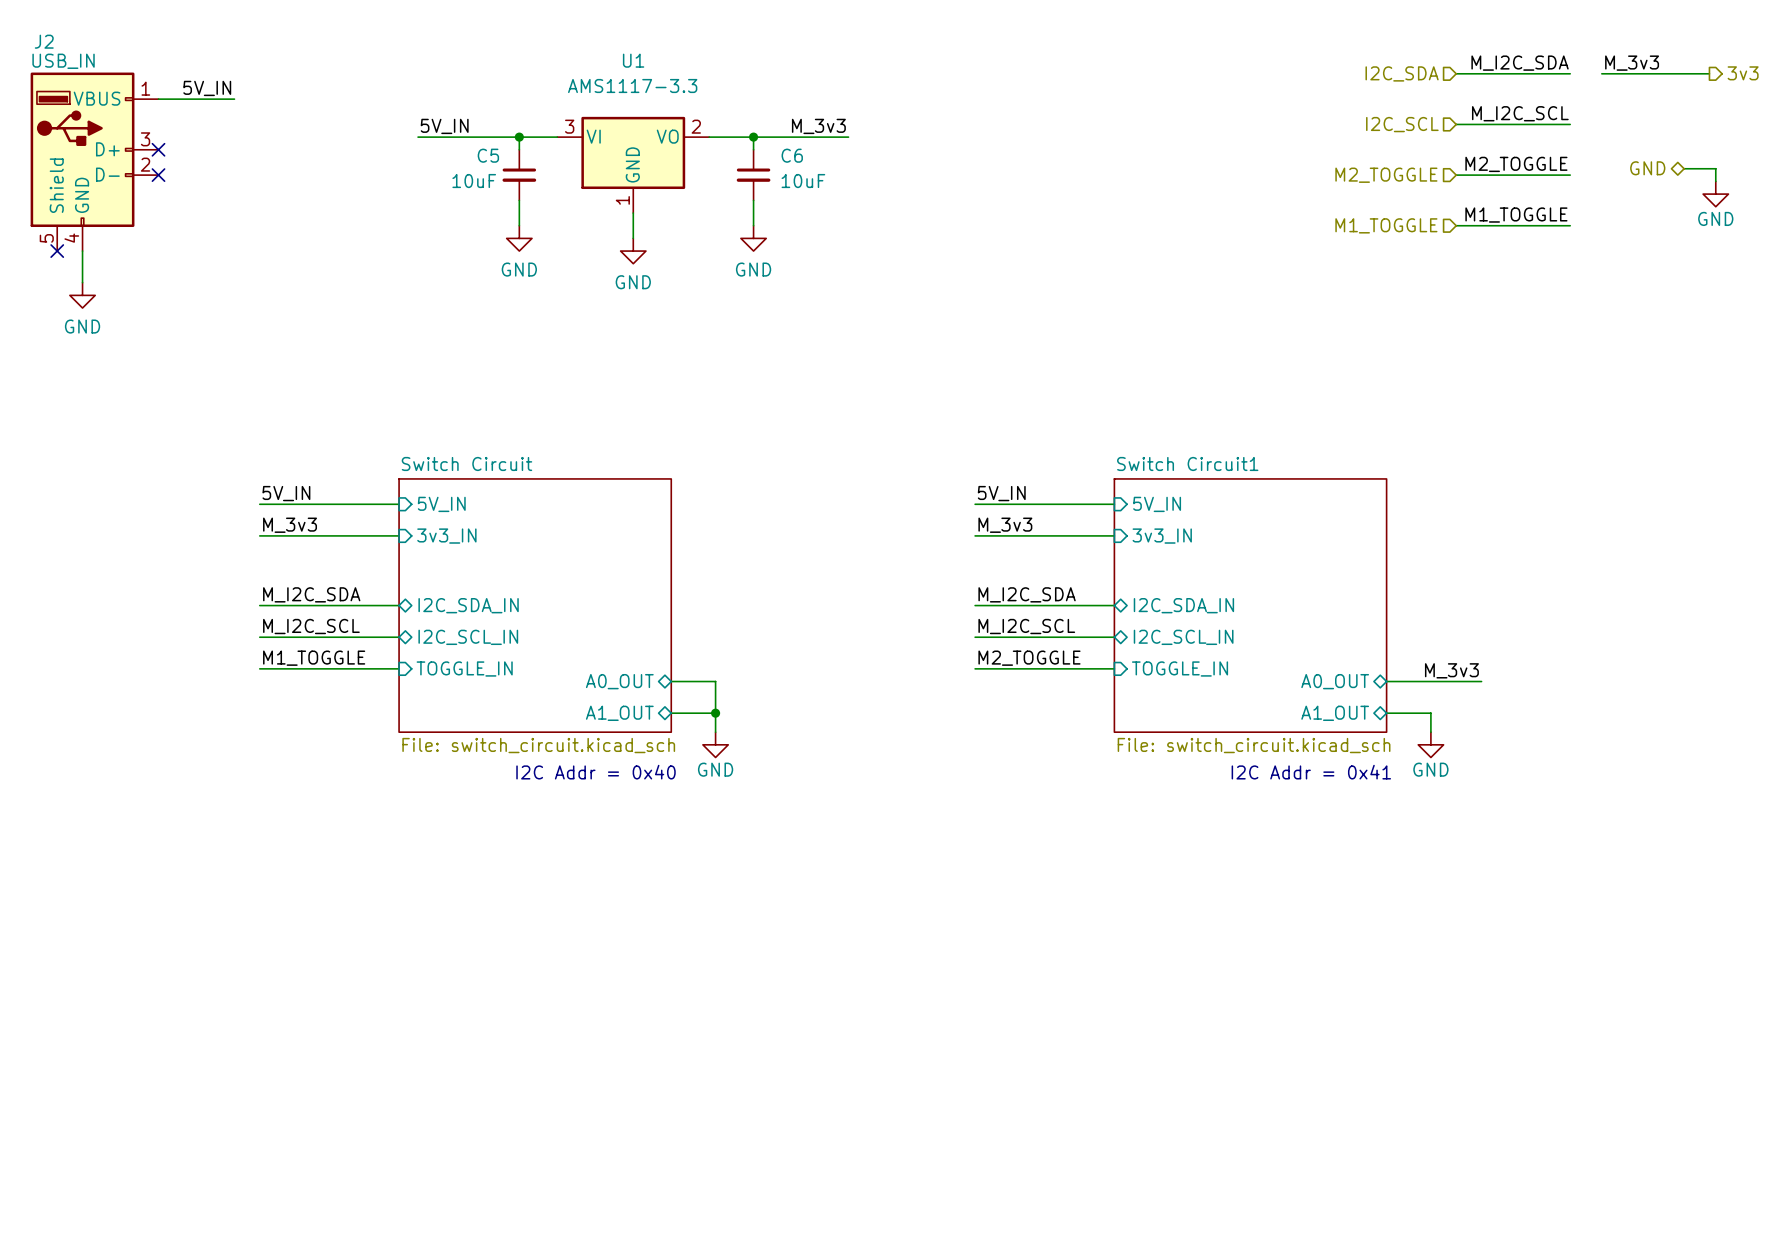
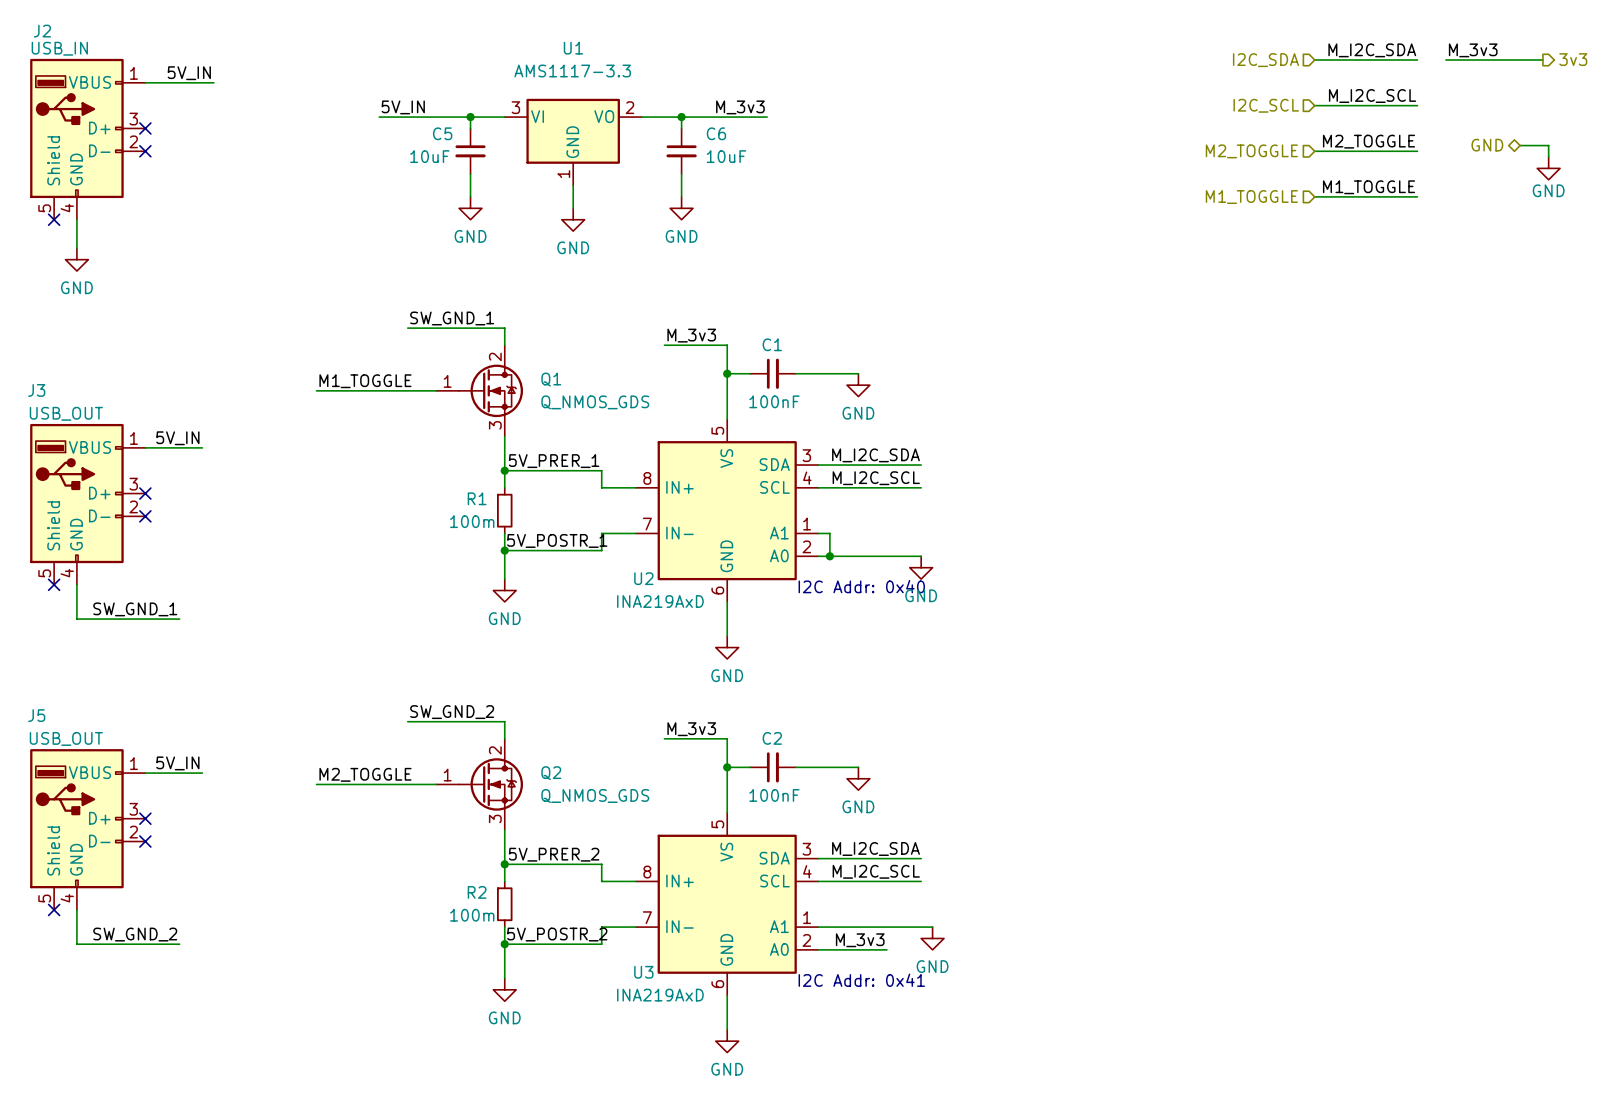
label: none -> SW_GND_1 (452, 318)
wire: none -> (407, 328) (504, 328) (504, 345)
label: none -> M_3v3 (691, 335)
wire: none -> (664, 345) (727, 345) (727, 419)
wire: none -> (727, 373) (750, 373)
junction: none -> (727, 373)
C1: none -> 100nF (772, 373)
wire: none -> (795, 373) (858, 373)
power symbol: none -> GND (858, 385)
wire: none -> (316, 390) (436, 390)
Q1: none -> Q_NMOS_GDS (479, 390)
wire: none -> (504, 436) (504, 487)
label position: 5V_IN (286, 493) -> 5V_IN (177, 438)
label: 5V_IN (1001, 493) -> none
wire: none -> (145, 447) (202, 447)
wire: (259, 504) (399, 504) -> none
sheet pin: 5V_IN (441, 504) -> none
wire: (975, 504) (1114, 504) -> none
sheet pin: 5V_IN (1157, 504) -> none
label: none -> 5V_PRER_1 (554, 461)
wire: none -> (818, 465) (921, 465)
label: M_3v3 (290, 525) -> none
label: M_3v3 (1005, 525) -> none
wire: none -> (504, 470) (601, 470) (601, 487) (635, 487)
junction: none -> (504, 470)
wire: (259, 535) (399, 535) -> none
wire: (975, 535) (1114, 535) -> none
sheet pin: 3v3_IN (446, 536) -> none
sheet pin: 3v3_IN (1162, 536) -> none
wire: none -> (818, 487) (921, 487)
no-connect mark: none -> (145, 493)
J3: none -> USB_OUT (87, 504)
R1: none -> 100m (504, 510)
U2: none -> INA219AxD (727, 510)
no-connect mark: none -> (145, 516)
label: M_I2C_SDA (311, 594) -> none
label position: M_I2C_SDA (1027, 594) -> M_I2C_SDA (875, 455)
wire: none -> (504, 533) (504, 579)
wire: none -> (635, 533) (601, 533) (601, 550) (504, 550)
wire: none -> (818, 533) (829, 533) (829, 556)
wire: (259, 605) (399, 605) -> none
sheet pin: I2C_SDA_IN (468, 605) -> none
sheet Switch Circuit: File: switch_circuit.kicad_sch (535, 605) -> none
wire: (975, 605) (1114, 605) -> none
sheet pin: I2C_SDA_IN (1183, 605) -> none
sheet Switch Circuit1: File: switch_circuit.kicad_sch (1250, 605) -> none
label: none -> 5V_POSTR_1 (557, 540)
junction: none -> (504, 550)
wire: none -> (818, 556) (921, 556)
junction: none -> (829, 556)
label: M_I2C_SCL (311, 626) -> none
label position: M_I2C_SCL (1026, 626) -> M_I2C_SCL (876, 478)
wire: (259, 637) (399, 637) -> none
sheet pin: I2C_SCL_IN (468, 637) -> none
wire: (975, 637) (1114, 637) -> none
power symbol: none -> GND (921, 567)
sheet pin: I2C_SCL_IN (1183, 637) -> none
no-connect mark: none -> (54, 584)
wire: none -> (76, 584) (76, 619) (179, 619)
label position: M1_TOGGLE (314, 658) -> M1_TOGGLE (365, 381)
text: none -> I2C Addr: 0x40 (861, 586)
label: M2_TOGGLE (1029, 658) -> none
power symbol: none -> GND (504, 590)
wire: (259, 668) (399, 668) -> none
wire: (975, 668) (1114, 668) -> none
sheet pin: TOGGLE_IN (464, 669) -> none
sheet pin: TOGGLE_IN (1180, 669) -> none
label: M_3v3 (1451, 670) -> none
wire: none -> (727, 601) (727, 636)
sheet pin: A0_OUT (619, 681) -> none
wire: (671, 681) (715, 681) (715, 732) -> none
sheet pin: A0_OUT (1335, 681) -> none
wire: (1386, 681) (1481, 681) -> none
label: none -> SW_GND_1 (135, 609)
sheet pin: A1_OUT (619, 713) -> none
wire: (671, 713) (715, 713) -> none
junction: (715, 713) -> none
sheet pin: A1_OUT (1335, 713) -> none
wire: (1386, 713) (1430, 713) (1430, 732) -> none
power symbol: none -> GND (727, 647)
power symbol: GND (715, 744) -> none
power symbol: GND (1430, 744) -> none
text: I2C Addr = 0x40 (596, 772) -> none
text: I2C Addr = 0x41 (1311, 772) -> none
label: none -> SW_GND_2 (452, 712)
wire: none -> (407, 721) (504, 721) (504, 738)
label: none -> M_3v3 (691, 729)
wire: none -> (664, 738) (727, 738) (727, 767)
label: none -> 5V_IN (177, 763)
wire: none -> (727, 767) (750, 767)
wire: none -> (727, 767) (727, 812)
junction: none -> (727, 767)
C2: none -> 100nF (772, 767)
wire: none -> (795, 767) (858, 767)
wire: none -> (145, 773) (202, 773)
label: none -> M2_TOGGLE (365, 774)
power symbol: none -> GND (858, 778)
wire: none -> (316, 784) (436, 784)
Q2: none -> Q_NMOS_GDS (479, 784)
no-connect mark: none -> (145, 818)
J5: none -> USB_OUT (87, 829)
wire: none -> (504, 830) (504, 881)
no-connect mark: none -> (145, 841)
label: none -> M_I2C_SDA (875, 848)
label: none -> 5V_PRER_2 (554, 854)
wire: none -> (818, 858) (921, 858)
wire: none -> (504, 864) (601, 864) (601, 881) (635, 881)
junction: none -> (504, 864)
label: none -> M_I2C_SCL (876, 871)
wire: none -> (818, 881) (921, 881)
R2: none -> 100m (504, 904)
U3: none -> INA219AxD (727, 904)
no-connect mark: none -> (54, 909)
wire: none -> (76, 909) (76, 944) (179, 944)
wire: none -> (504, 927) (504, 978)
wire: none -> (635, 927) (601, 927) (601, 944) (504, 944)
wire: none -> (818, 927) (932, 927)
label: none -> SW_GND_2 (135, 934)
label: none -> 5V_POSTR_2 (557, 934)
power symbol: none -> GND (932, 938)
label: none -> M_3v3 (860, 940)
junction: none -> (504, 944)
wire: none -> (818, 949) (886, 949)
text: none -> I2C Addr: 0x41 (861, 980)
power symbol: none -> GND (504, 989)
wire: none -> (727, 995) (727, 1029)
power symbol: none -> GND (727, 1041)

